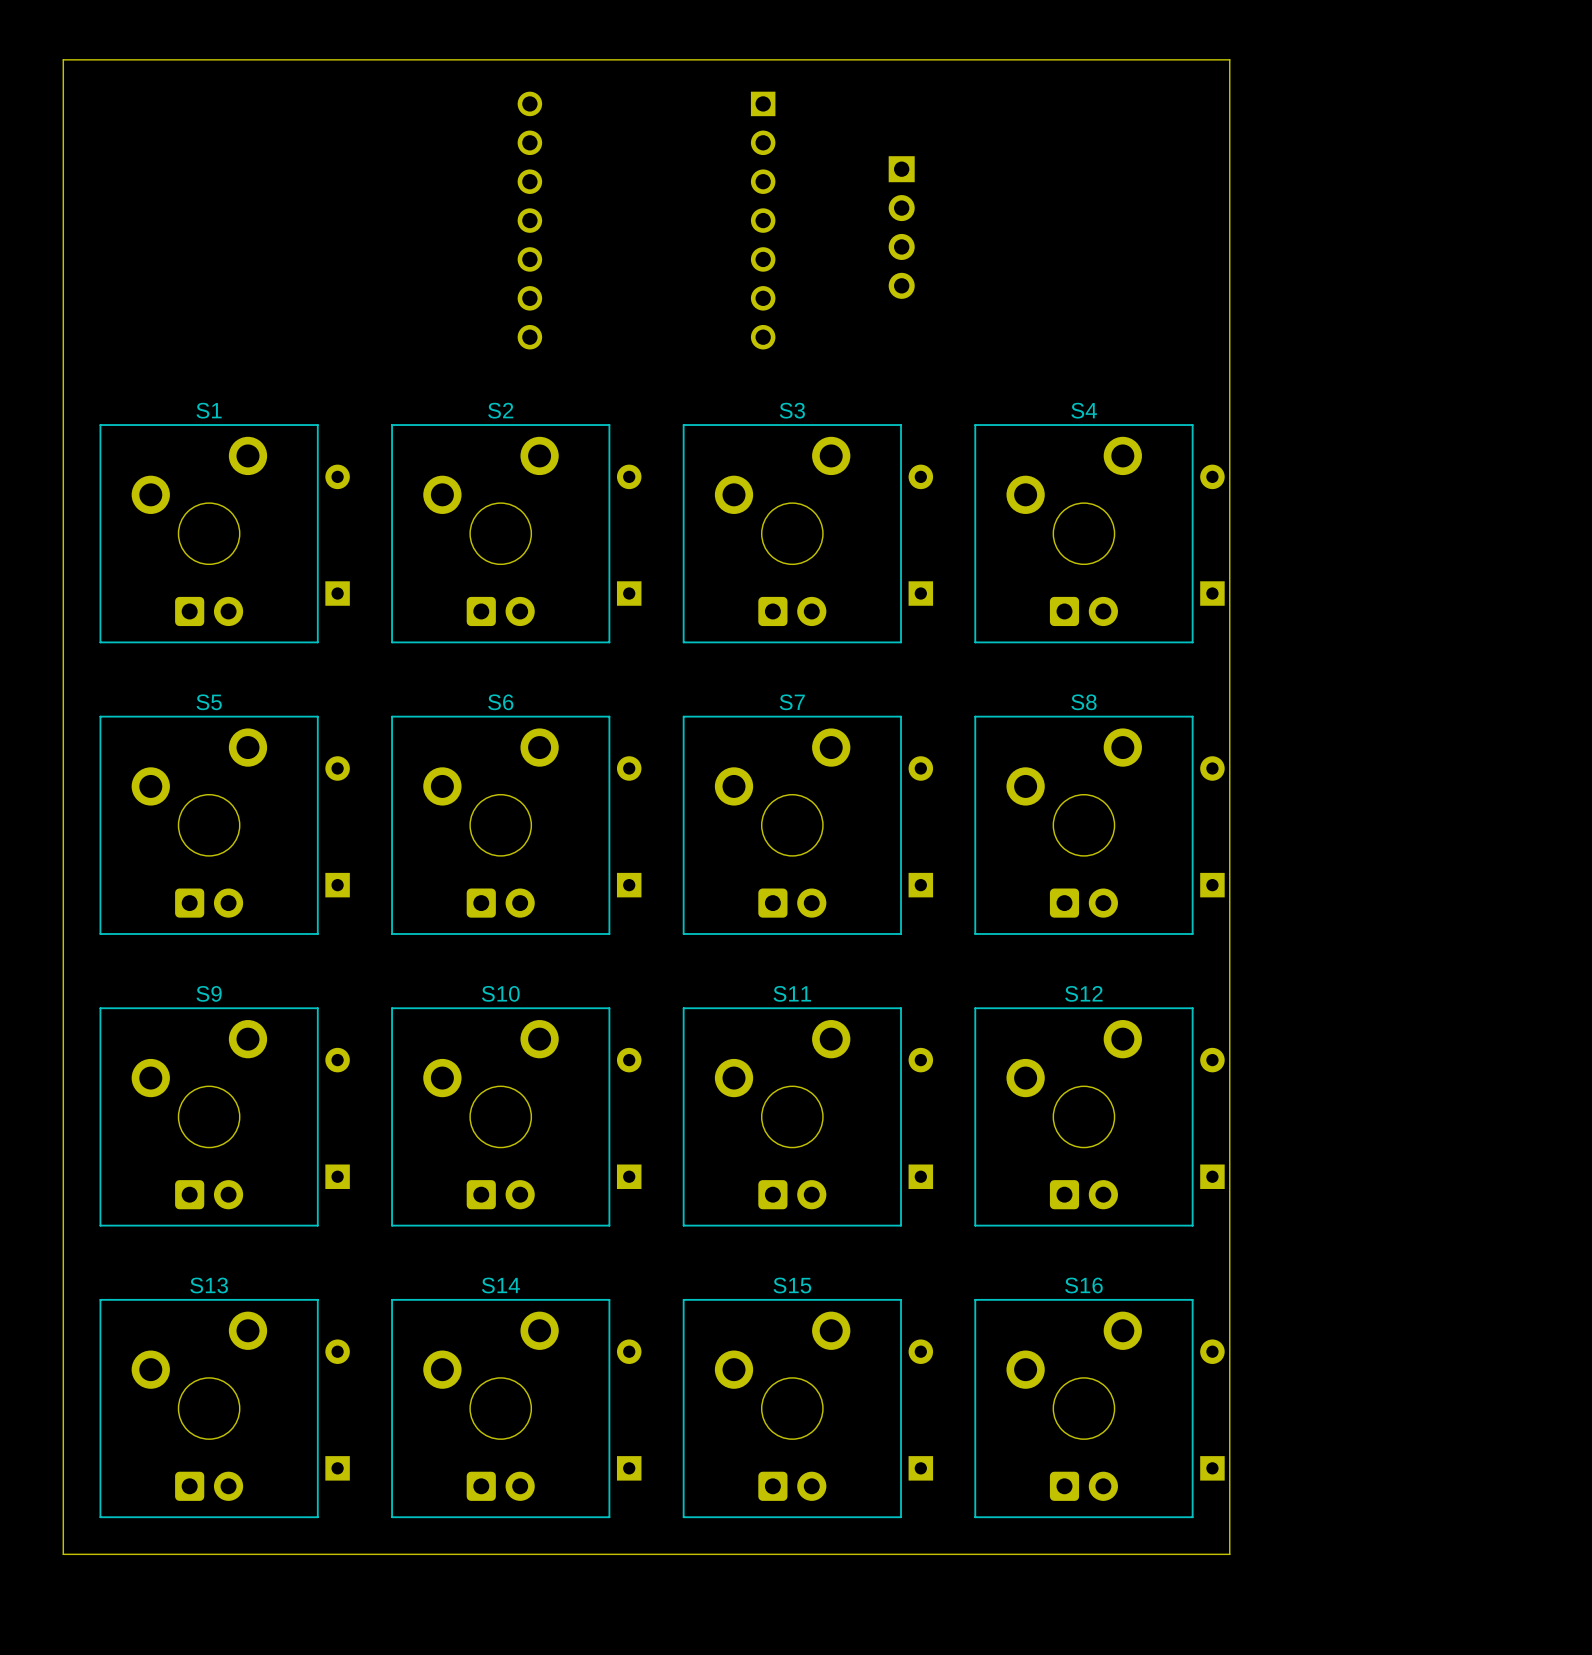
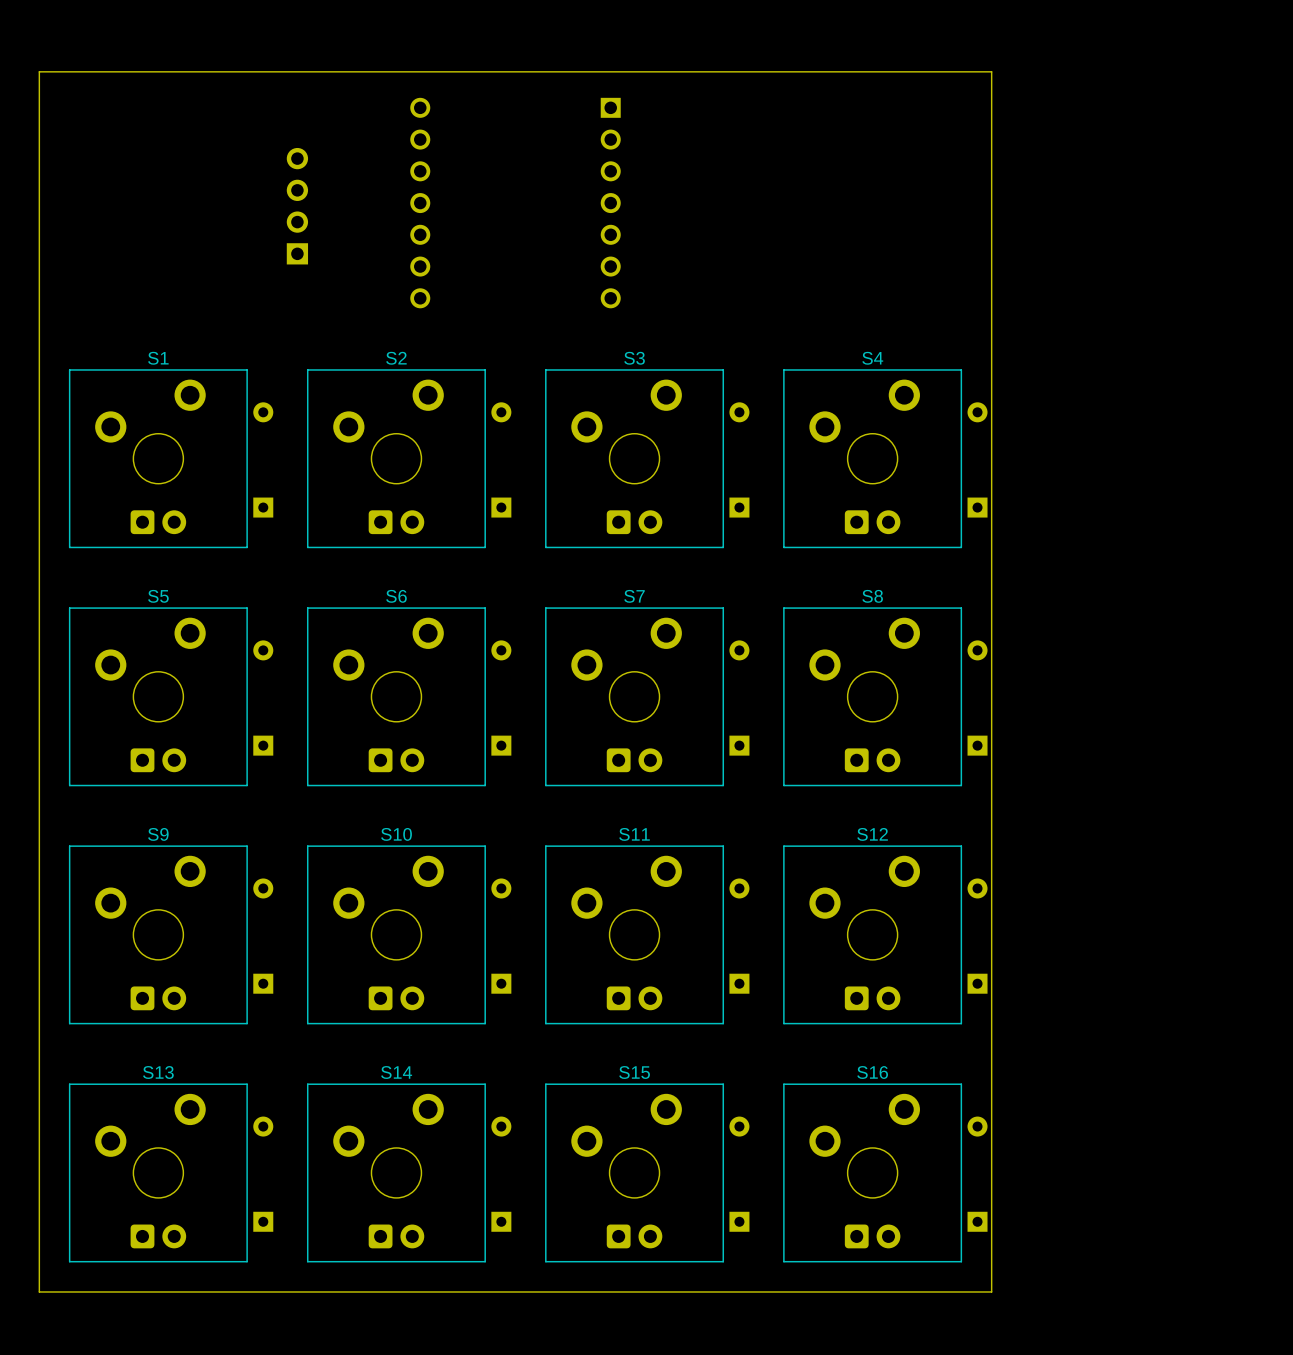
part: none -> (297, 206)
part: (901, 227) -> none

